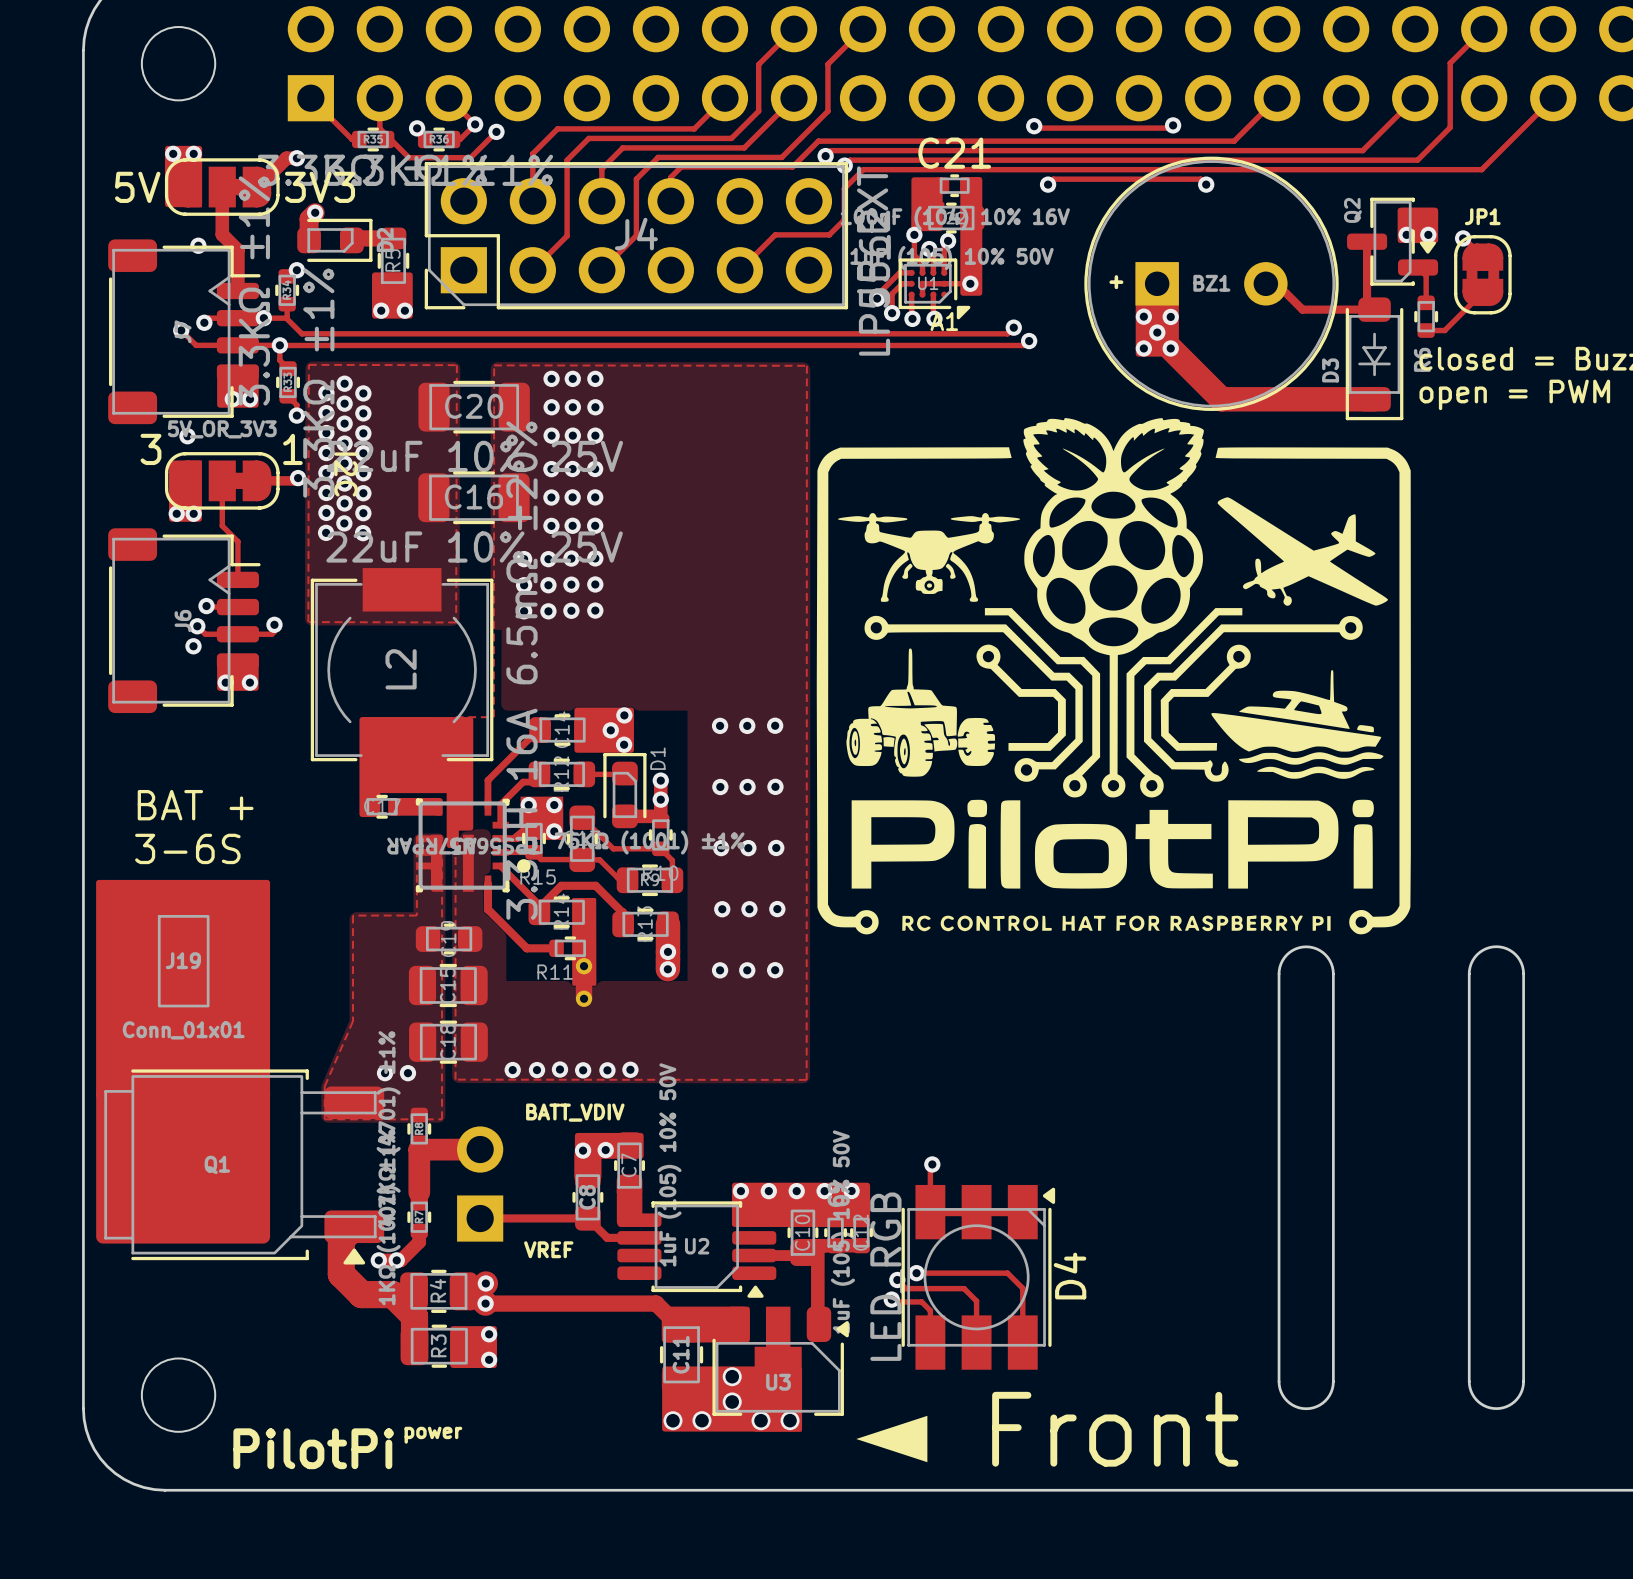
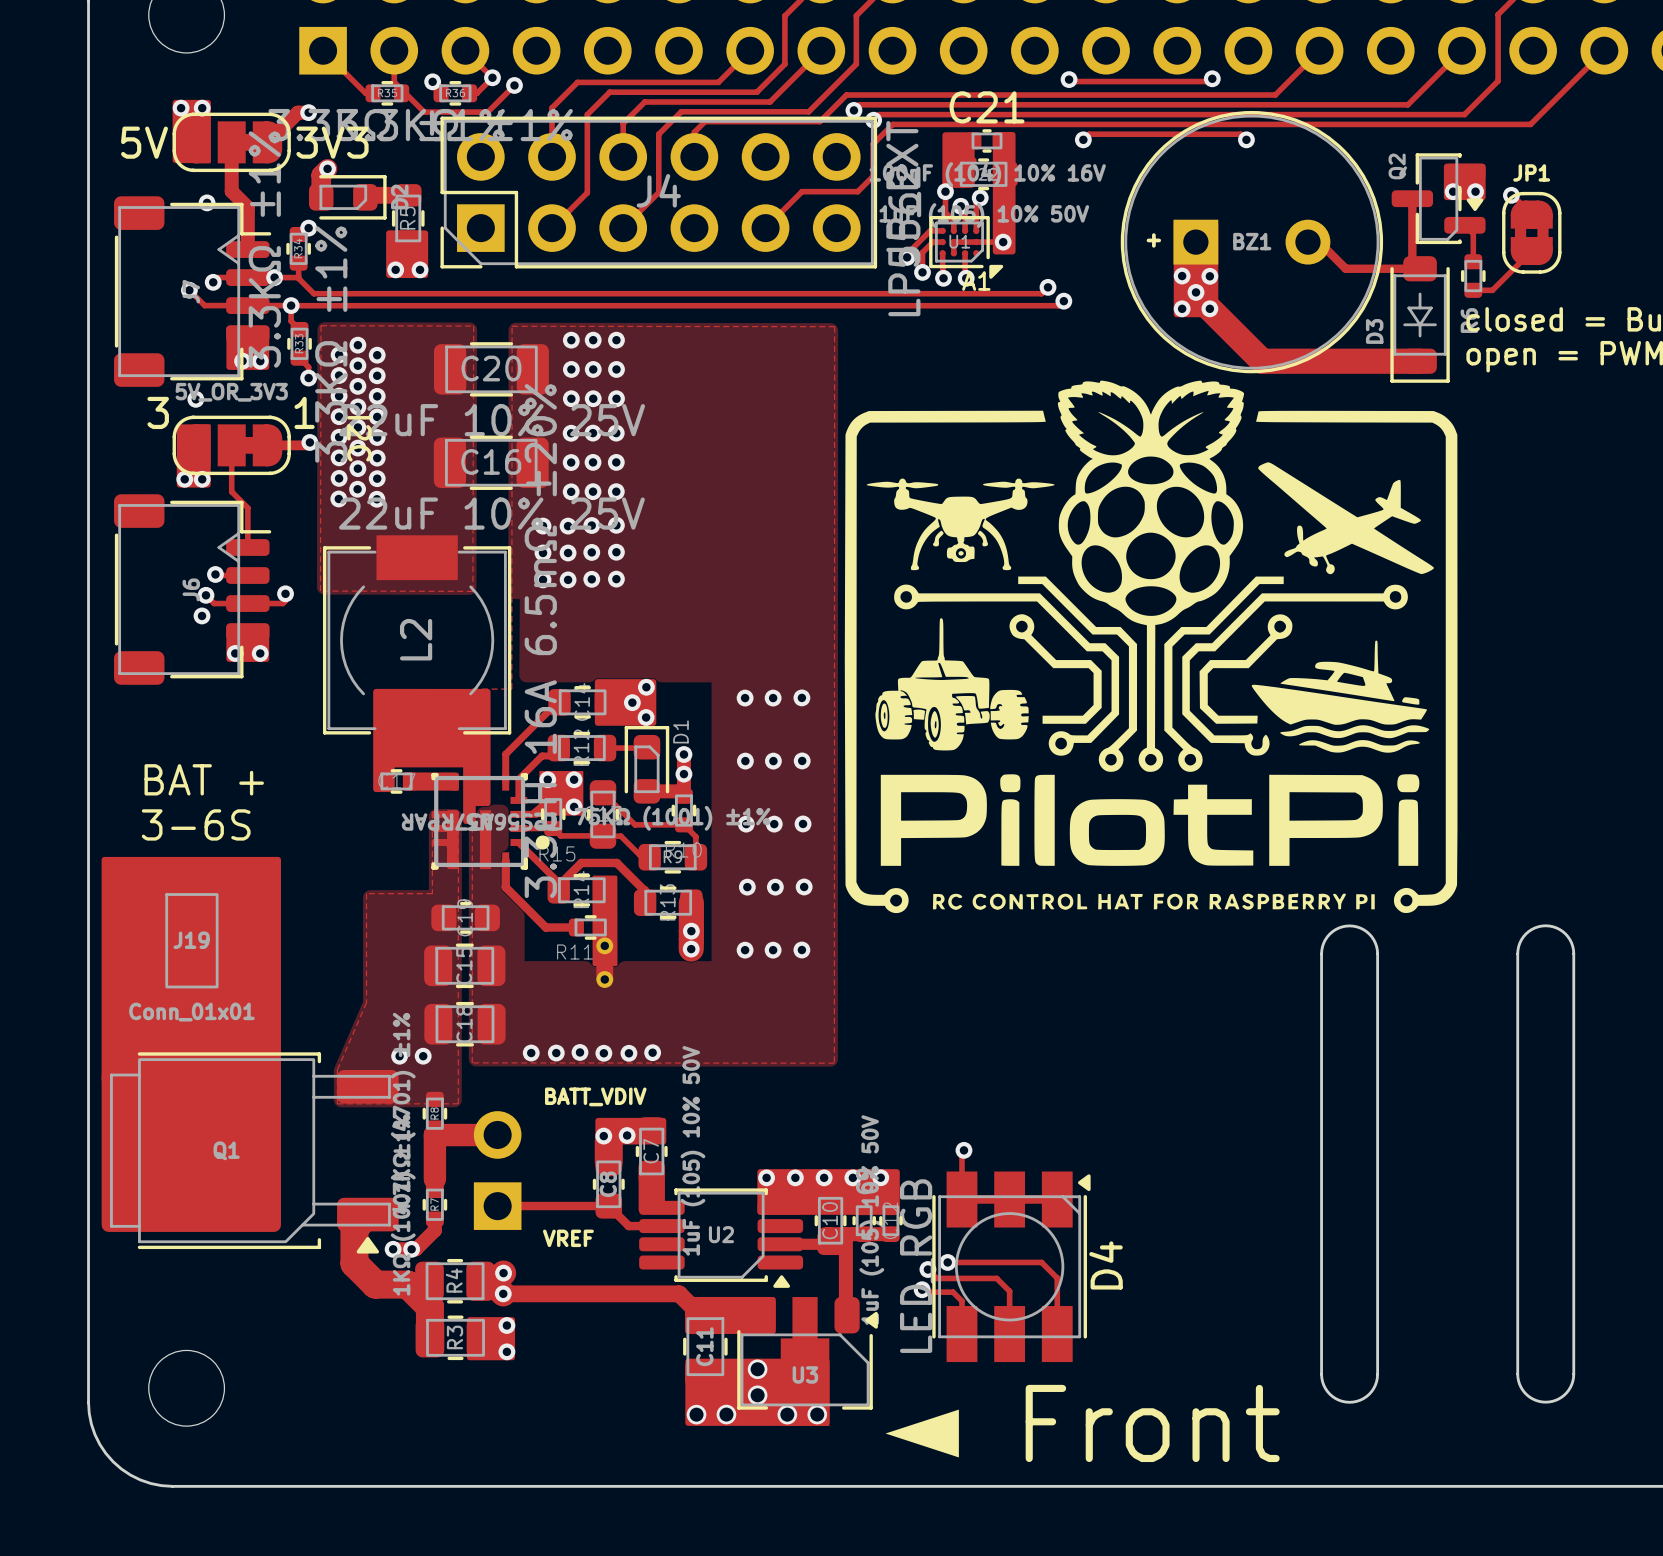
text: power (433, 1435) -> none
text: PilotPi (313, 1448) -> none

